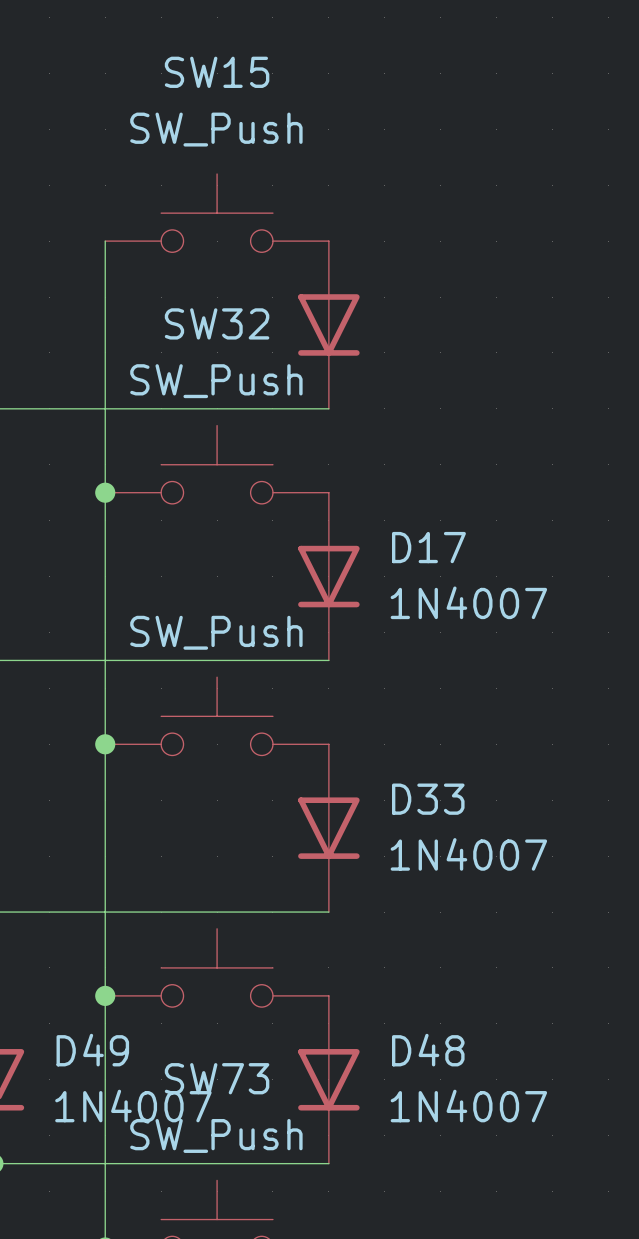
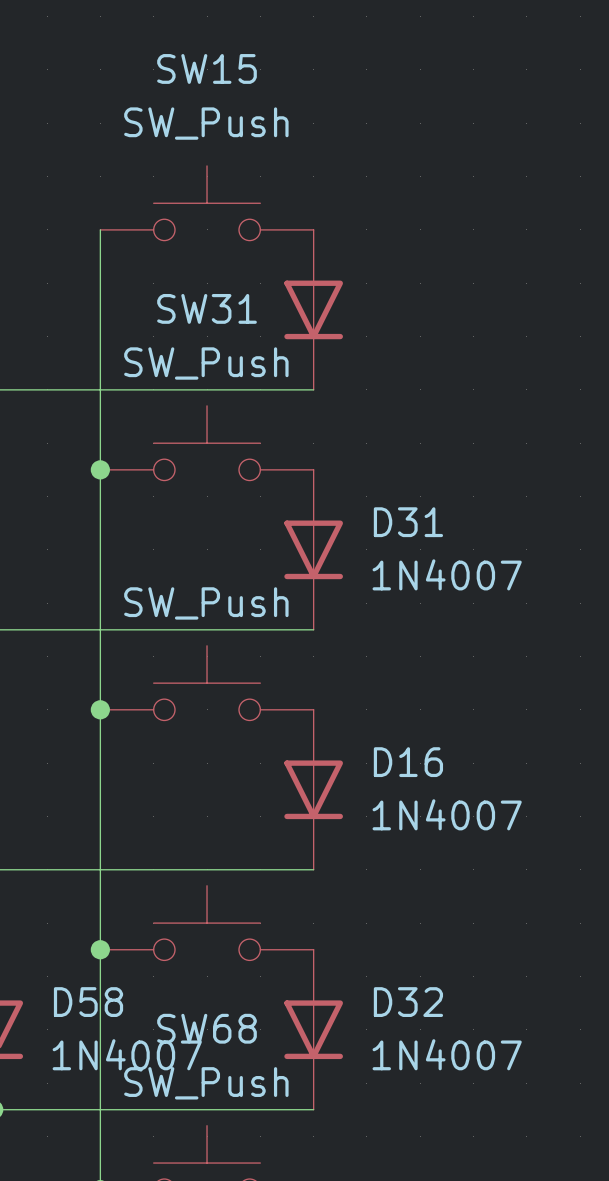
SW32 name: SW32 (217, 323) -> SW31 (207, 308)
D17 name: D17 (428, 547) -> D31 (408, 522)
D33 name: D33 (428, 799) -> D16 (408, 762)
D49 name: D49 (92, 1050) -> D58 (88, 1002)
D48 name: D48 (428, 1050) -> D32 (408, 1002)
SW73 name: SW73 (217, 1078) -> SW68 (207, 1028)

